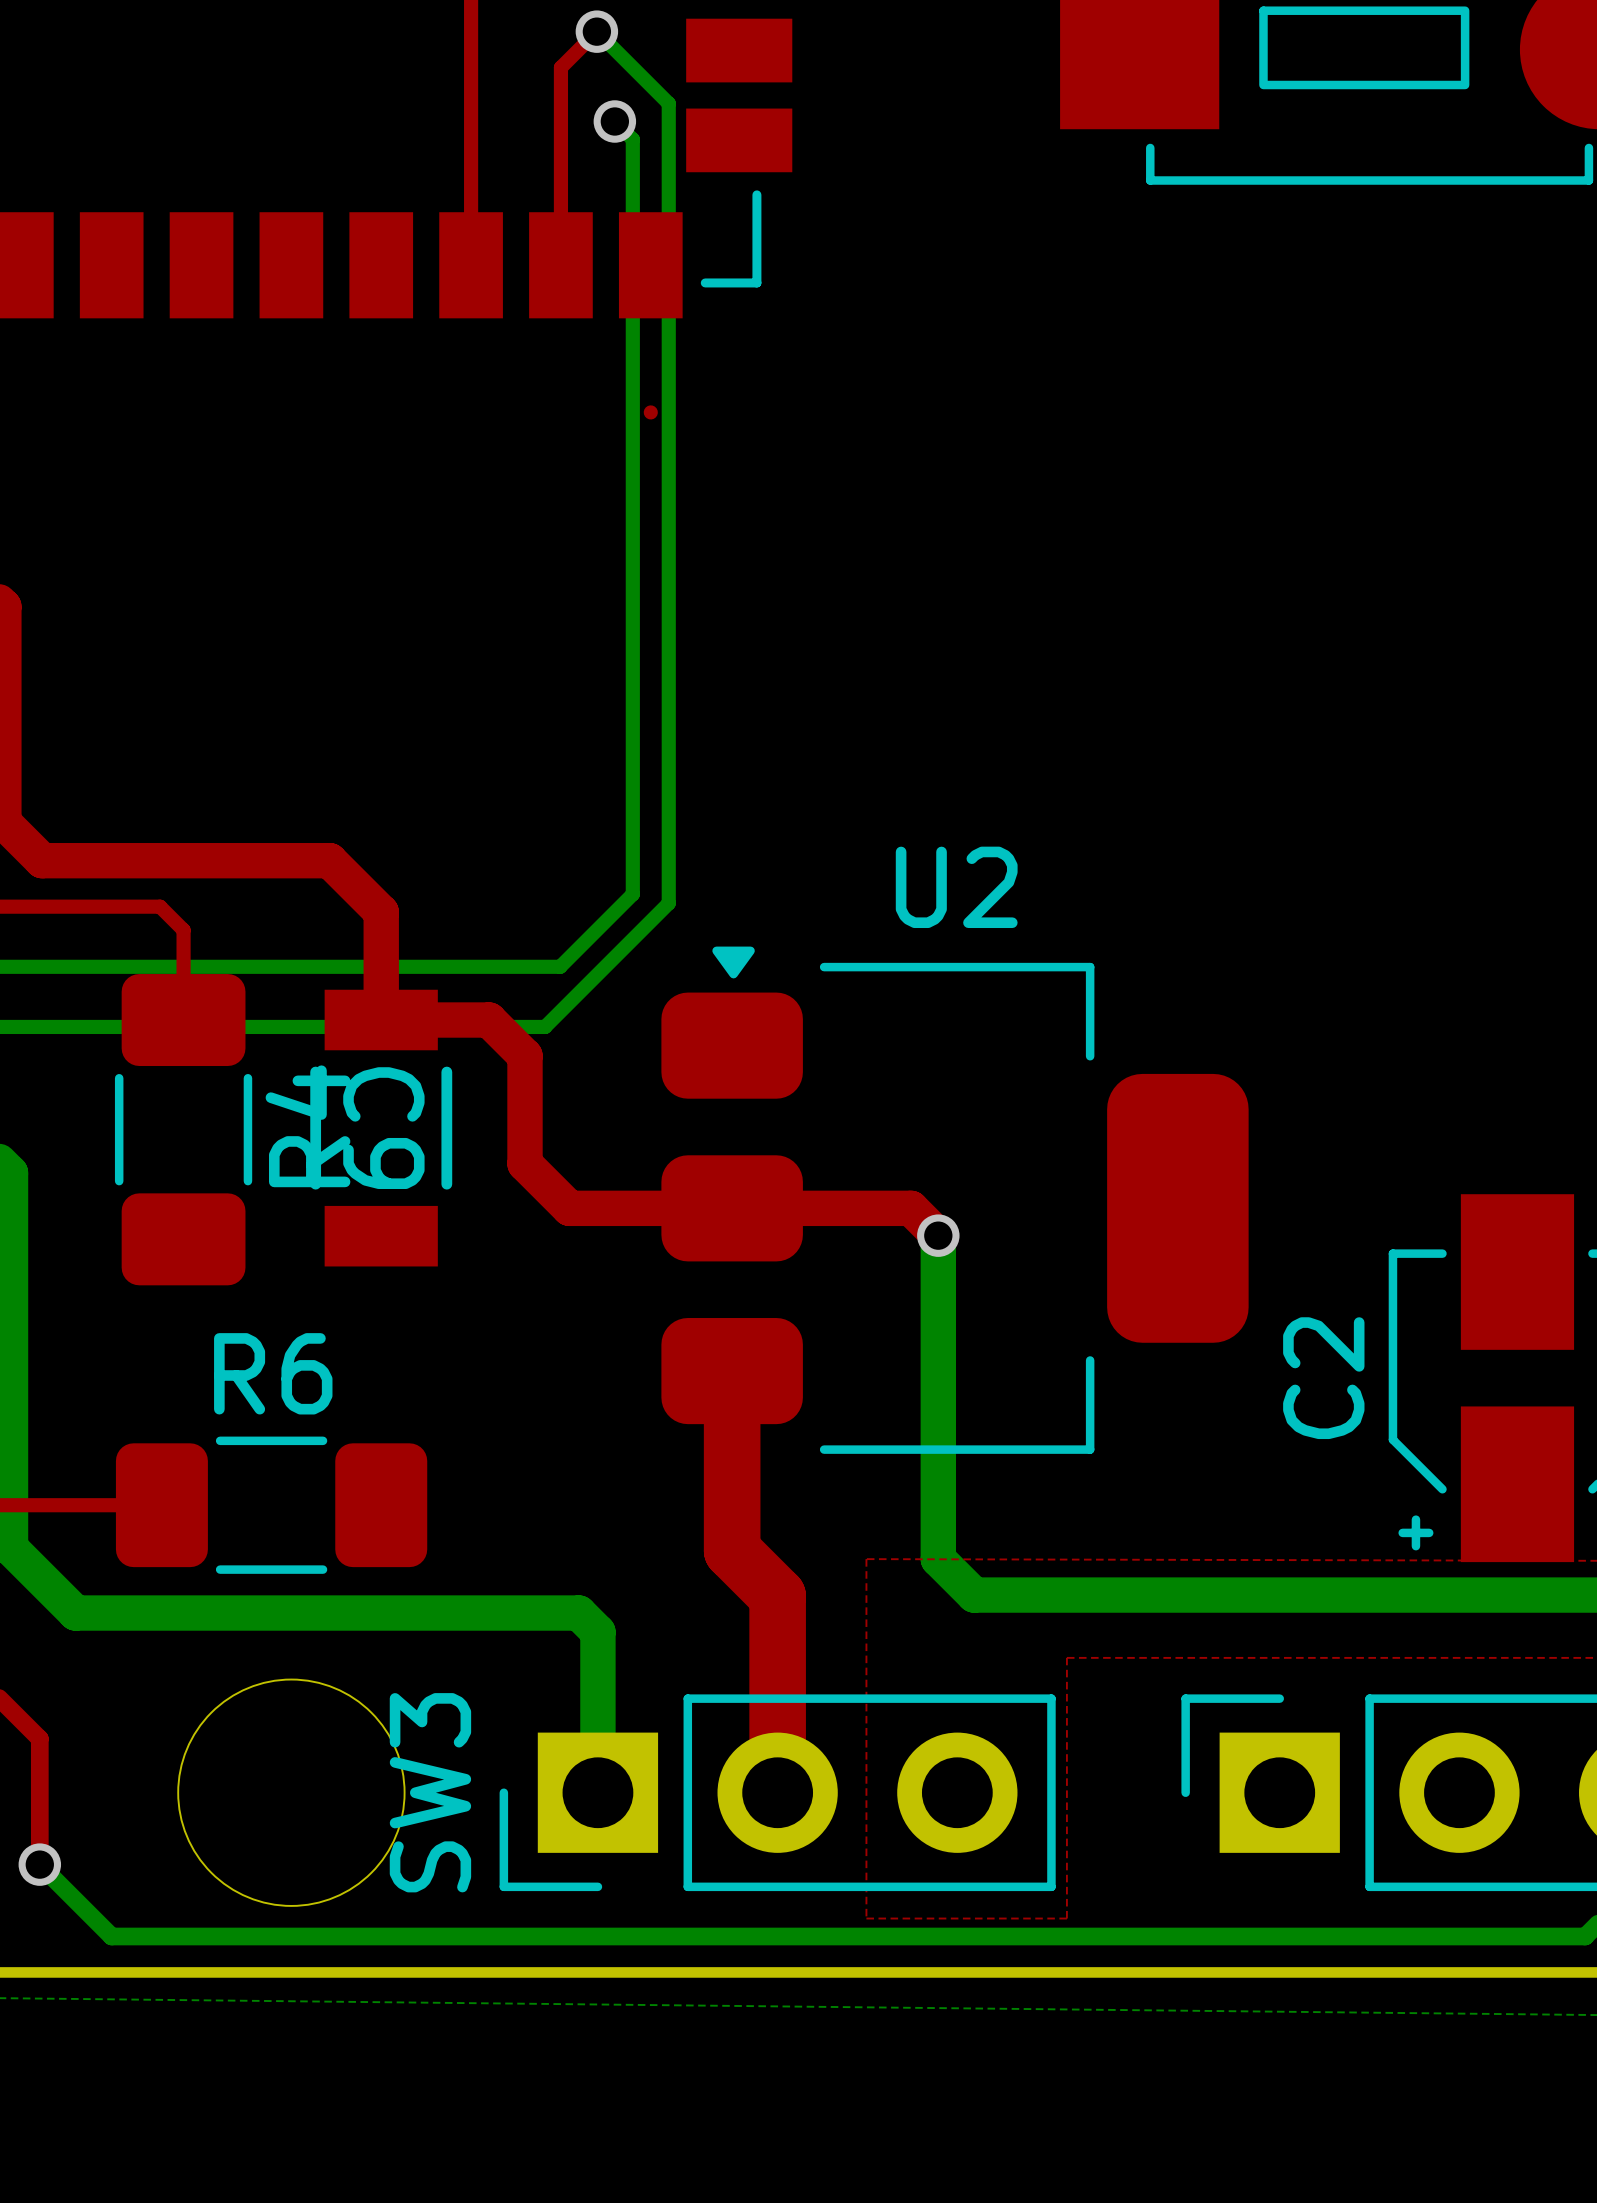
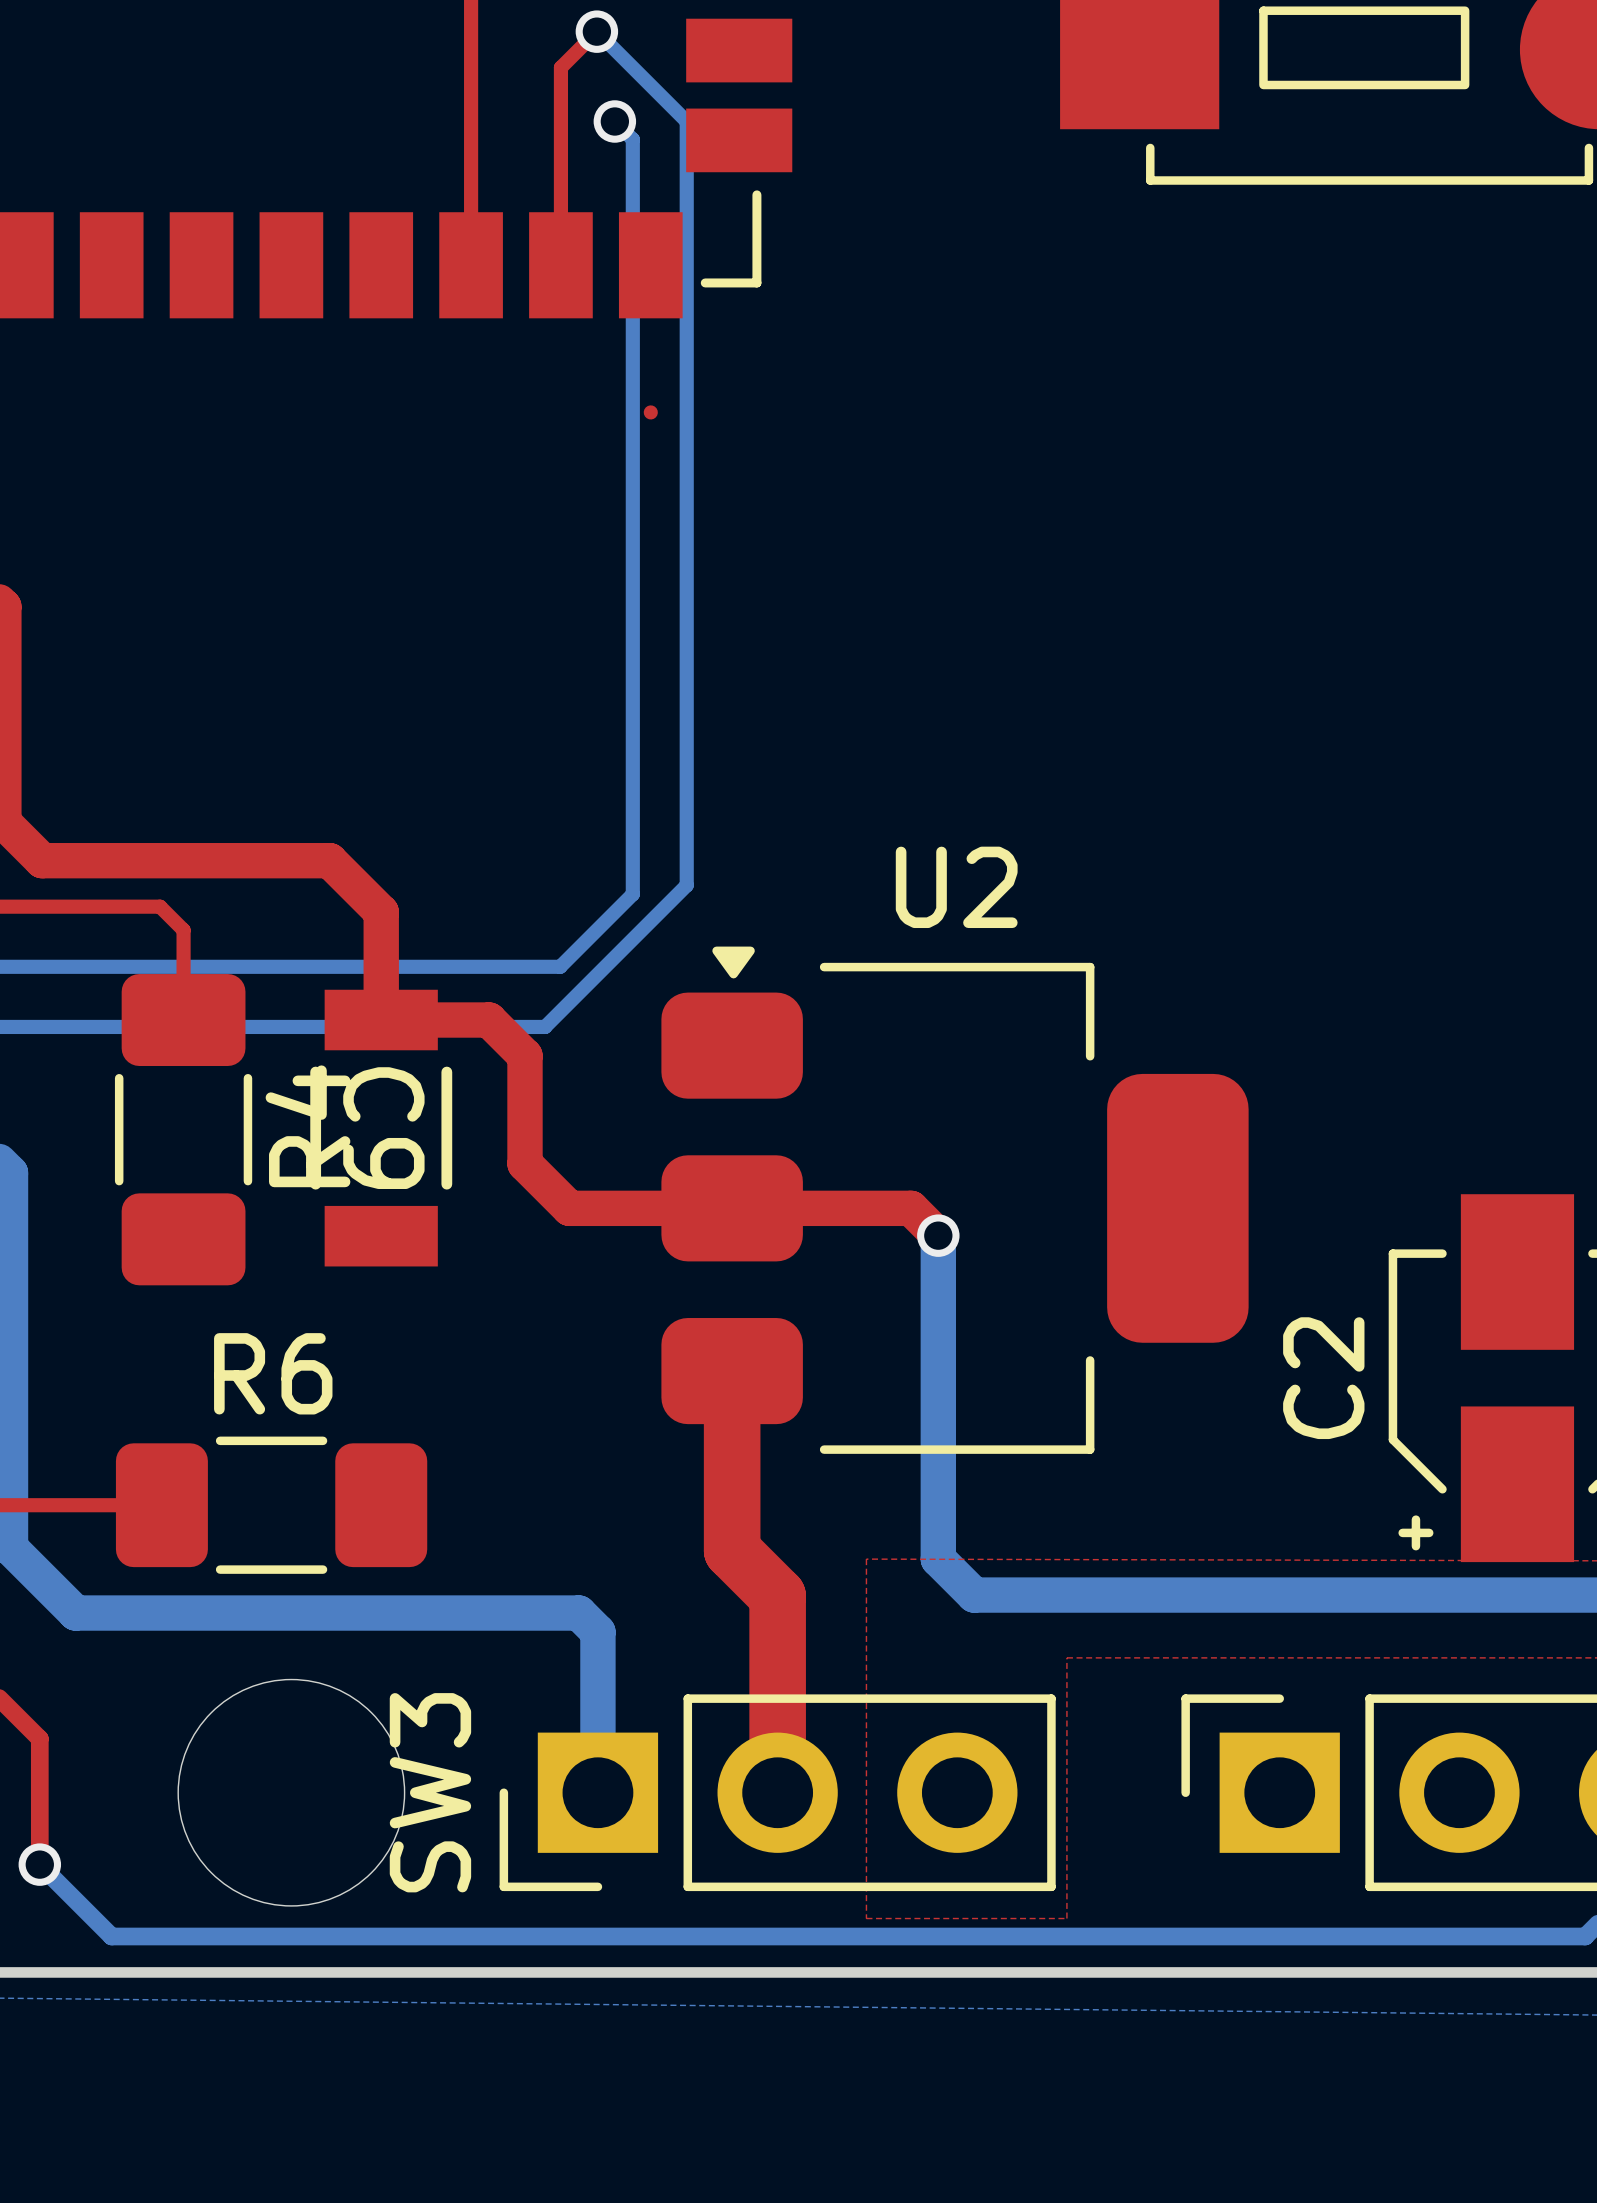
bottom track: (668, 103) (668, 903) -> (668, 103) (686, 121) (686, 885) (668, 903)

